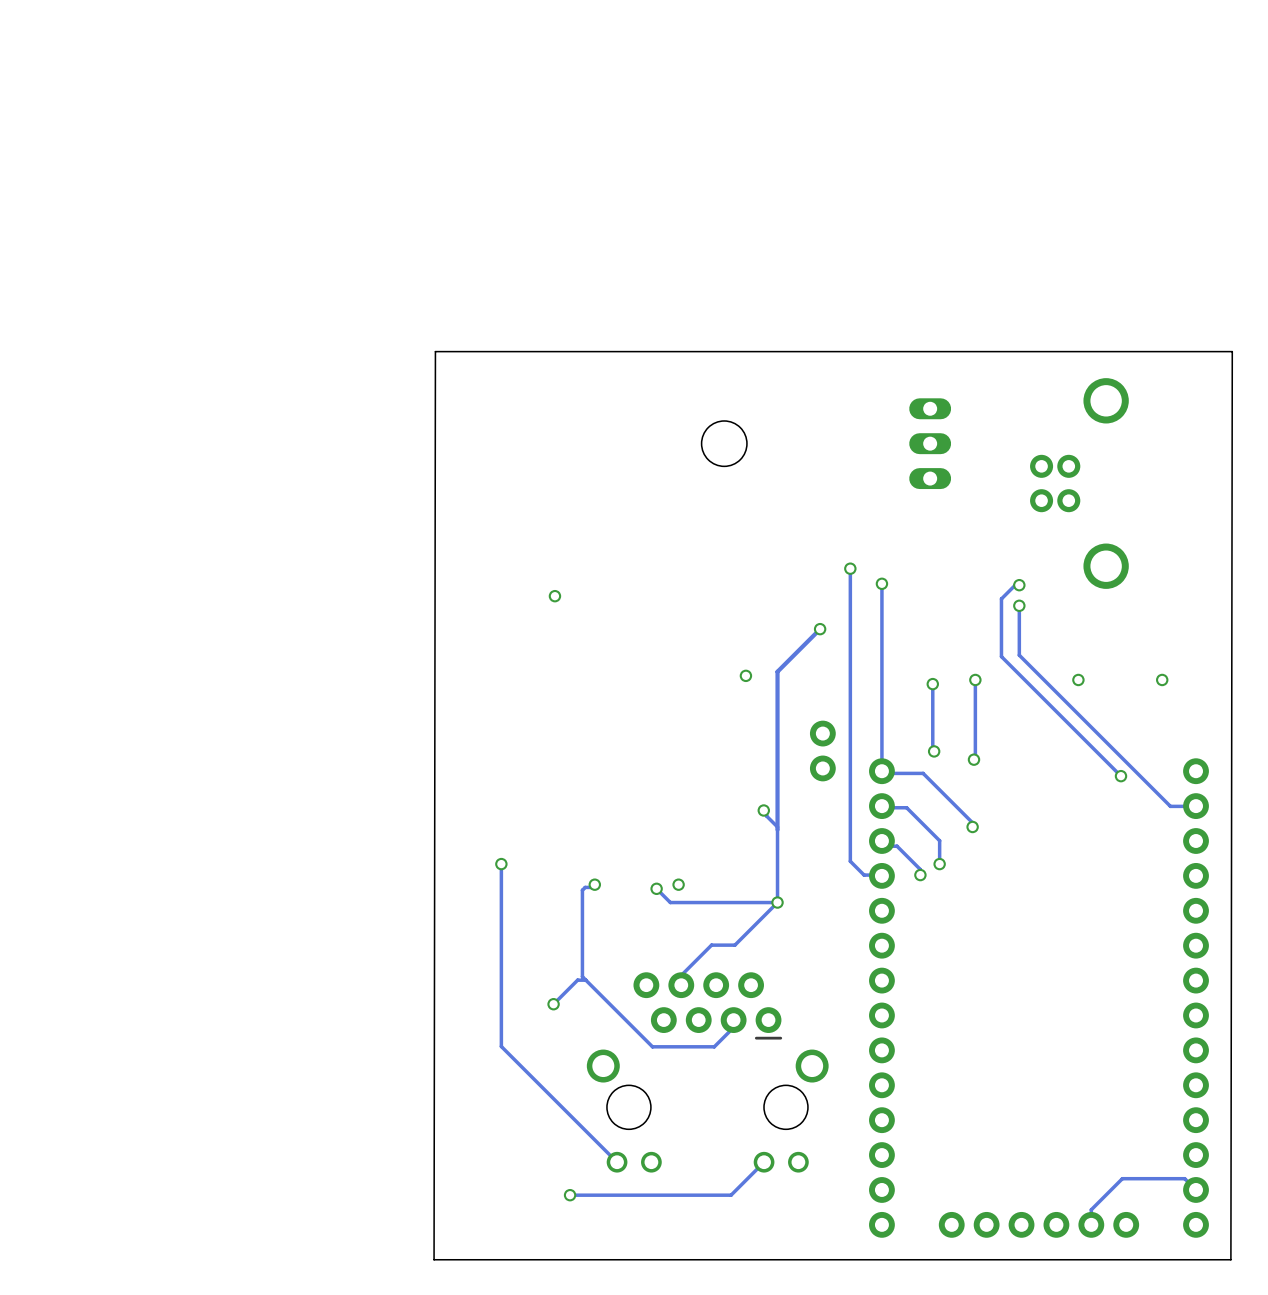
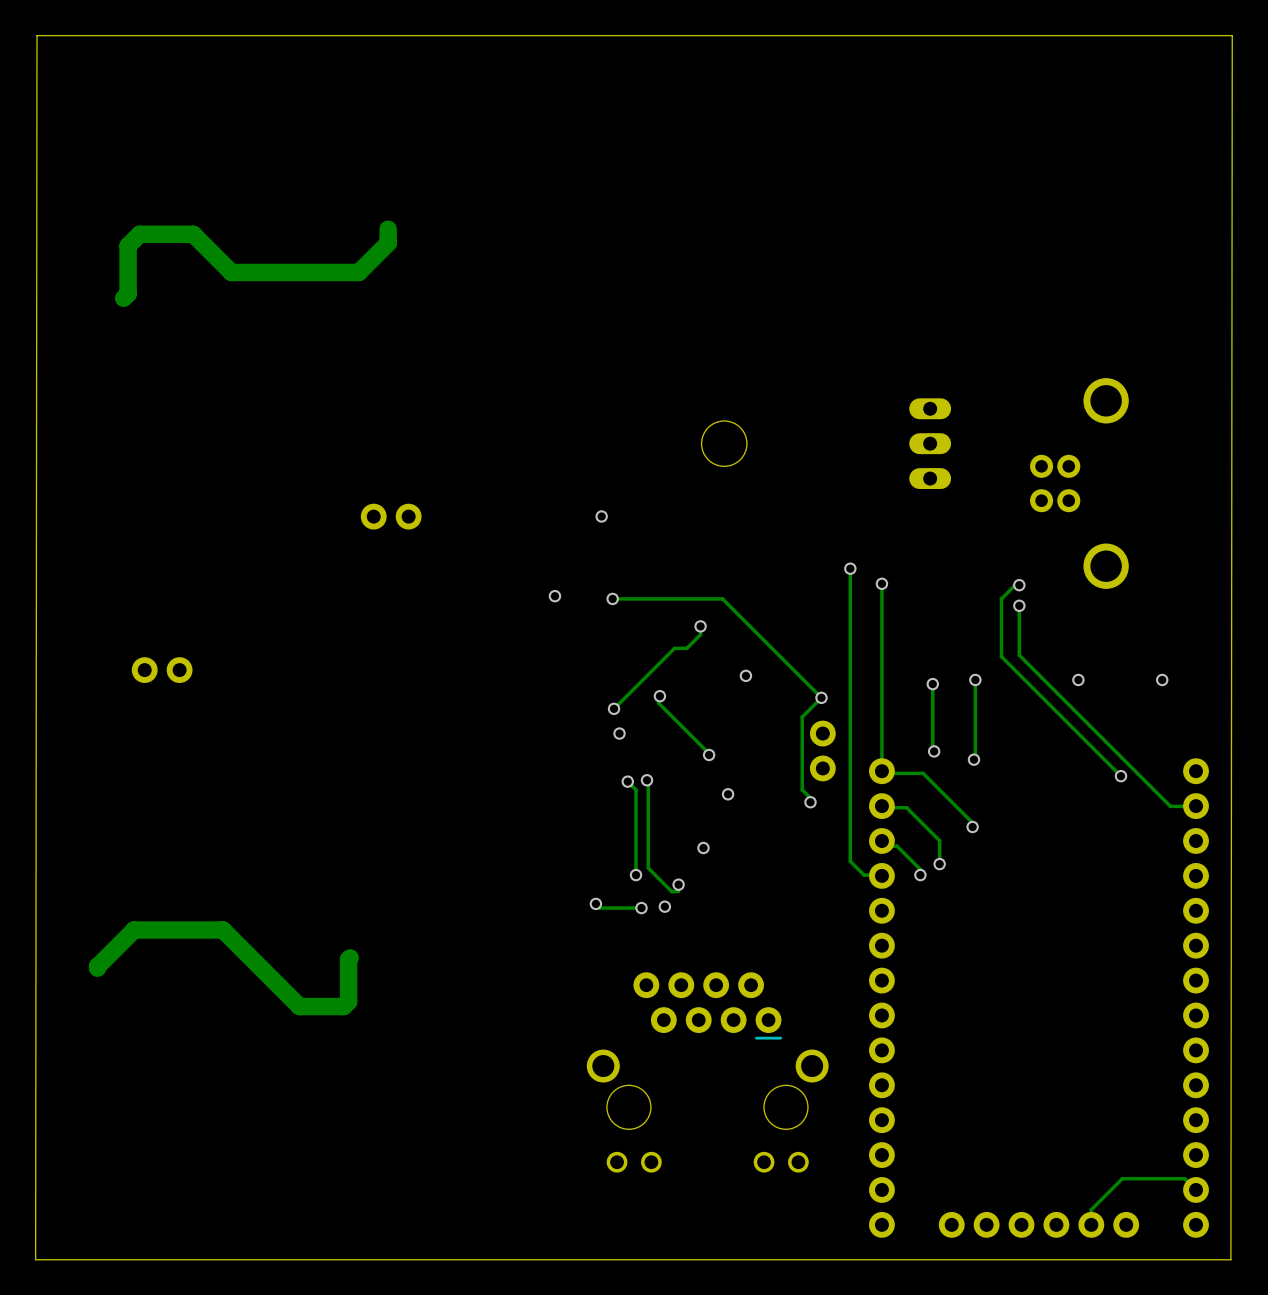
track: none -> (388, 229) (388, 243) (358, 272) (231, 272) (193, 234) (139, 234) (128, 245) (128, 293) (123, 298)
part: none -> (391, 516)
via: none -> (601, 516)
track: none -> (612, 598) (722, 598) (821, 697) (802, 717) (802, 789) (810, 798) (810, 802)
via: none -> (612, 598)
track: none -> (700, 626) (700, 634) (686, 648) (674, 648) (614, 708)
via: none -> (700, 626)
track: (820, 629) (777, 671) (777, 829) -> none
via: (820, 629) -> none
part: none -> (162, 670)
track: none -> (659, 696) (658, 703) (709, 754)
via: none -> (659, 696)
via: none -> (821, 697)
via: none -> (614, 708)
via: none -> (619, 733)
via: none -> (709, 754)
track: none -> (647, 780) (648, 868) (671, 891) (678, 891)
via: none -> (647, 780)
track: none -> (627, 781) (636, 789) (636, 875)
via: none -> (627, 781)
via: none -> (728, 794)
via: none -> (810, 802)
track: (763, 810) (777, 826) (777, 902) -> none
via: (763, 810) -> none
via: none -> (703, 848)
track: (501, 864) (501, 1046) (617, 1162) -> none
via: (501, 864) -> none
via: none -> (636, 875)
track: (594, 884) (582, 890) (582, 976) (652, 1046) (714, 1046) (733, 1027) (733, 1020) -> none
via position: (594, 884) -> (595, 903)
track: (656, 888) (670, 902) (777, 902) -> none
via: (656, 888) -> none
track: (777, 902) (734, 945) (711, 945) (681, 975) (681, 985) -> none
via: (777, 902) -> none
track: none -> (595, 903) (600, 908) (641, 908)
via: none -> (664, 906)
via: none -> (641, 908)
track: none -> (350, 957) (348, 1001) (343, 1006) (299, 1006) (223, 930) (134, 930) (97, 968)
track: (585, 980) (577, 980) (553, 1004) -> none
via: (553, 1004) -> none
track: (764, 1162) (731, 1195) (570, 1195) -> none
via: (570, 1195) -> none
board edge: (1230, 1259) (1232, 351) (435, 351) (434, 1259) -> (1230, 1259) (1232, 35) (37, 35) (35, 1259) (434, 1259)

